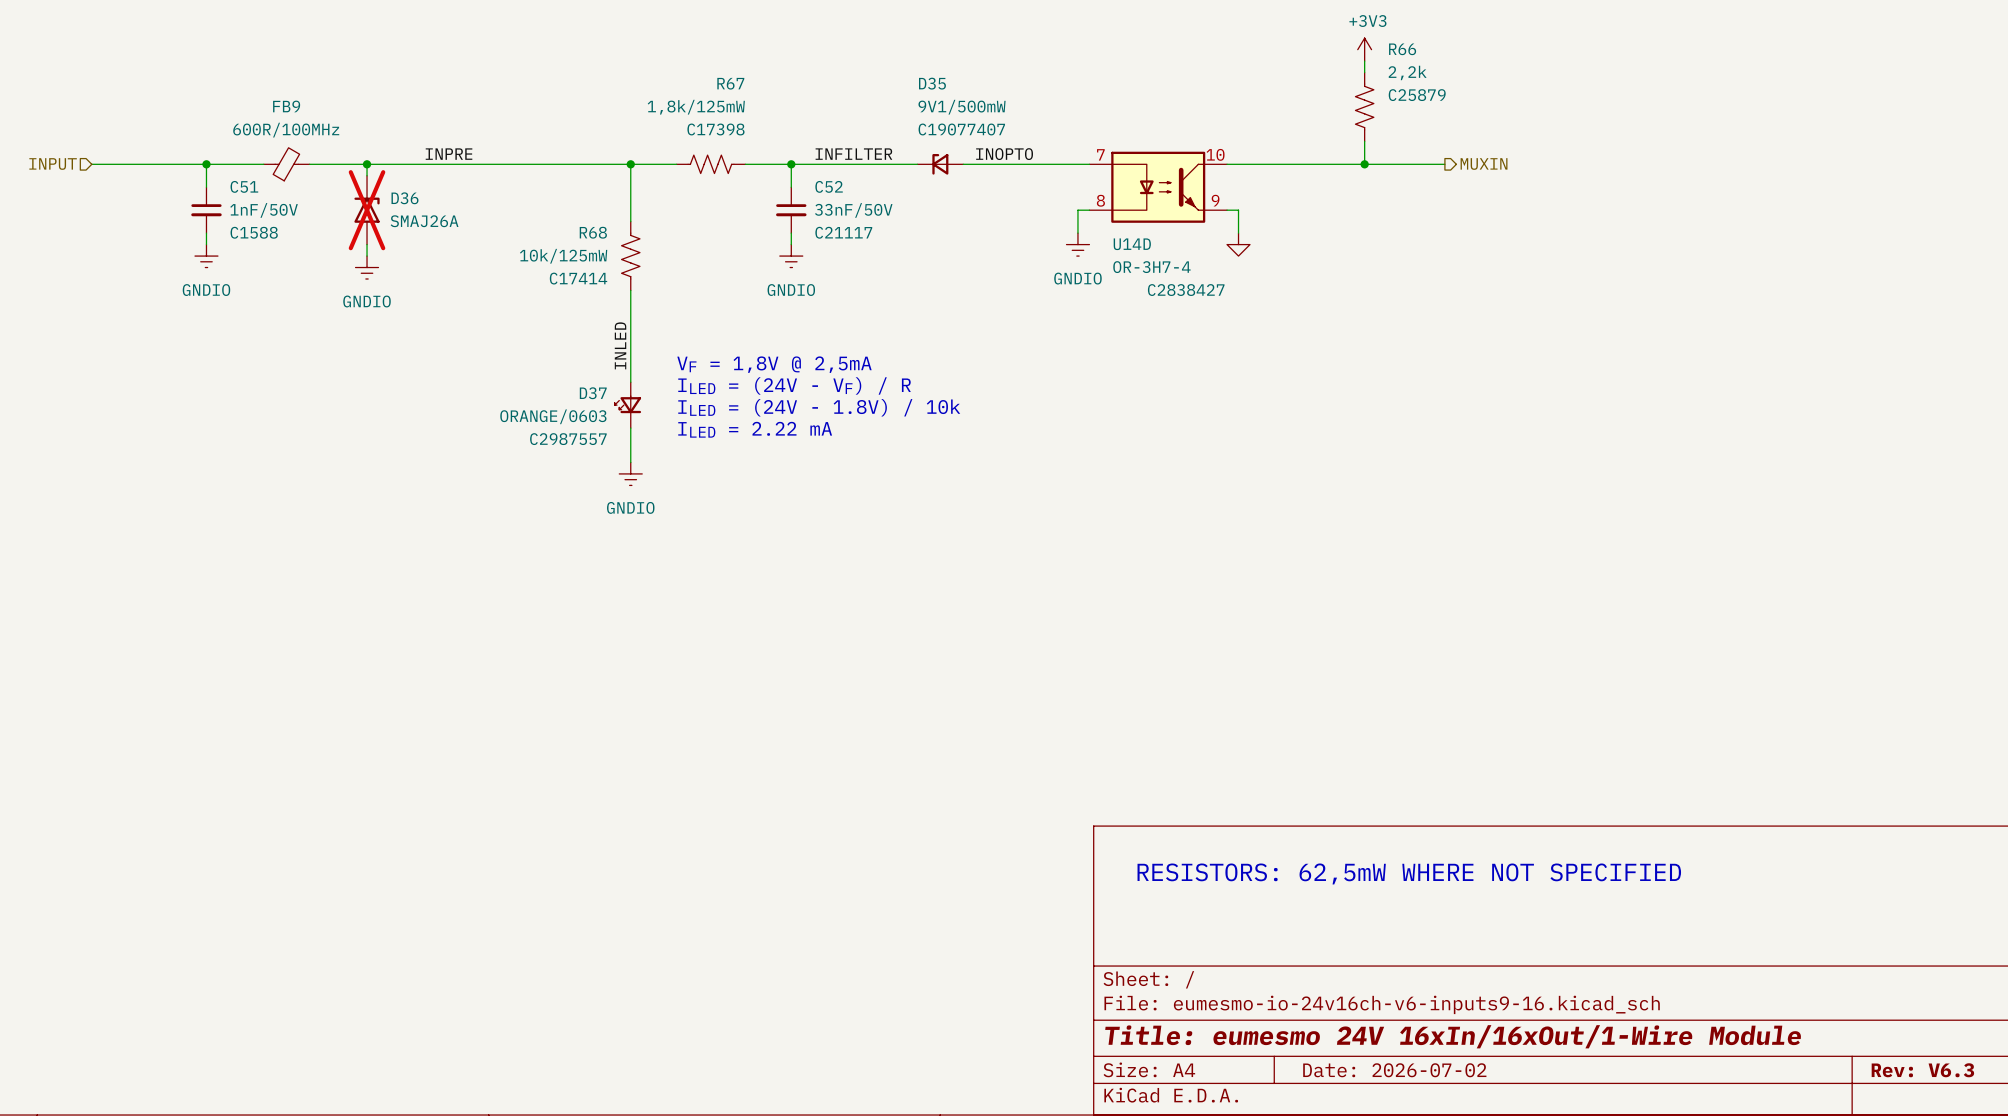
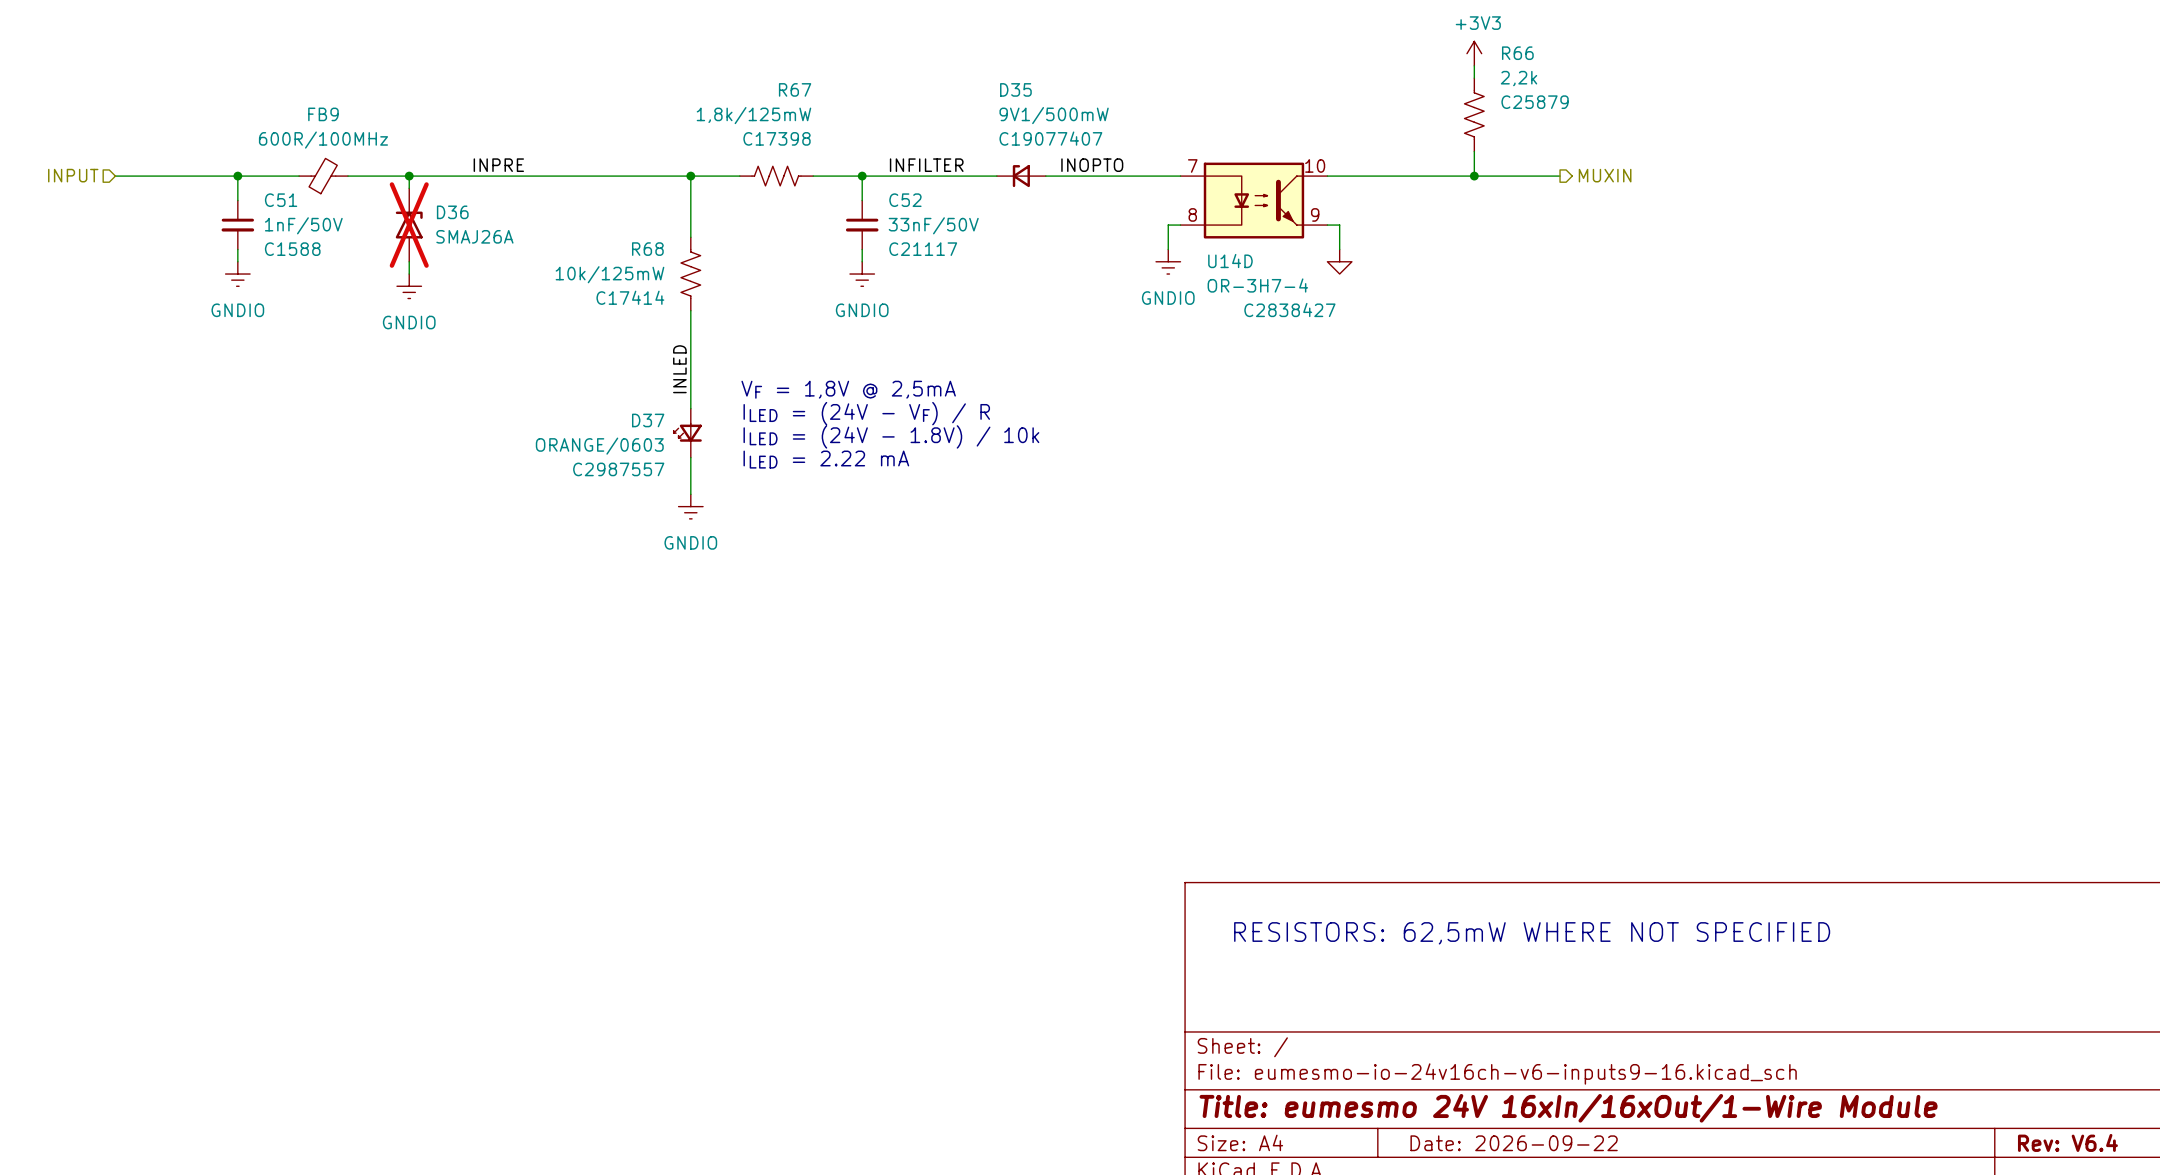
title block: Date: 2026-07-02 (1394, 1070) -> Date: 2026-09-22 (1514, 1143)
title block: Rev: V6.3 (1922, 1070) -> Rev: V6.4 (2067, 1142)

